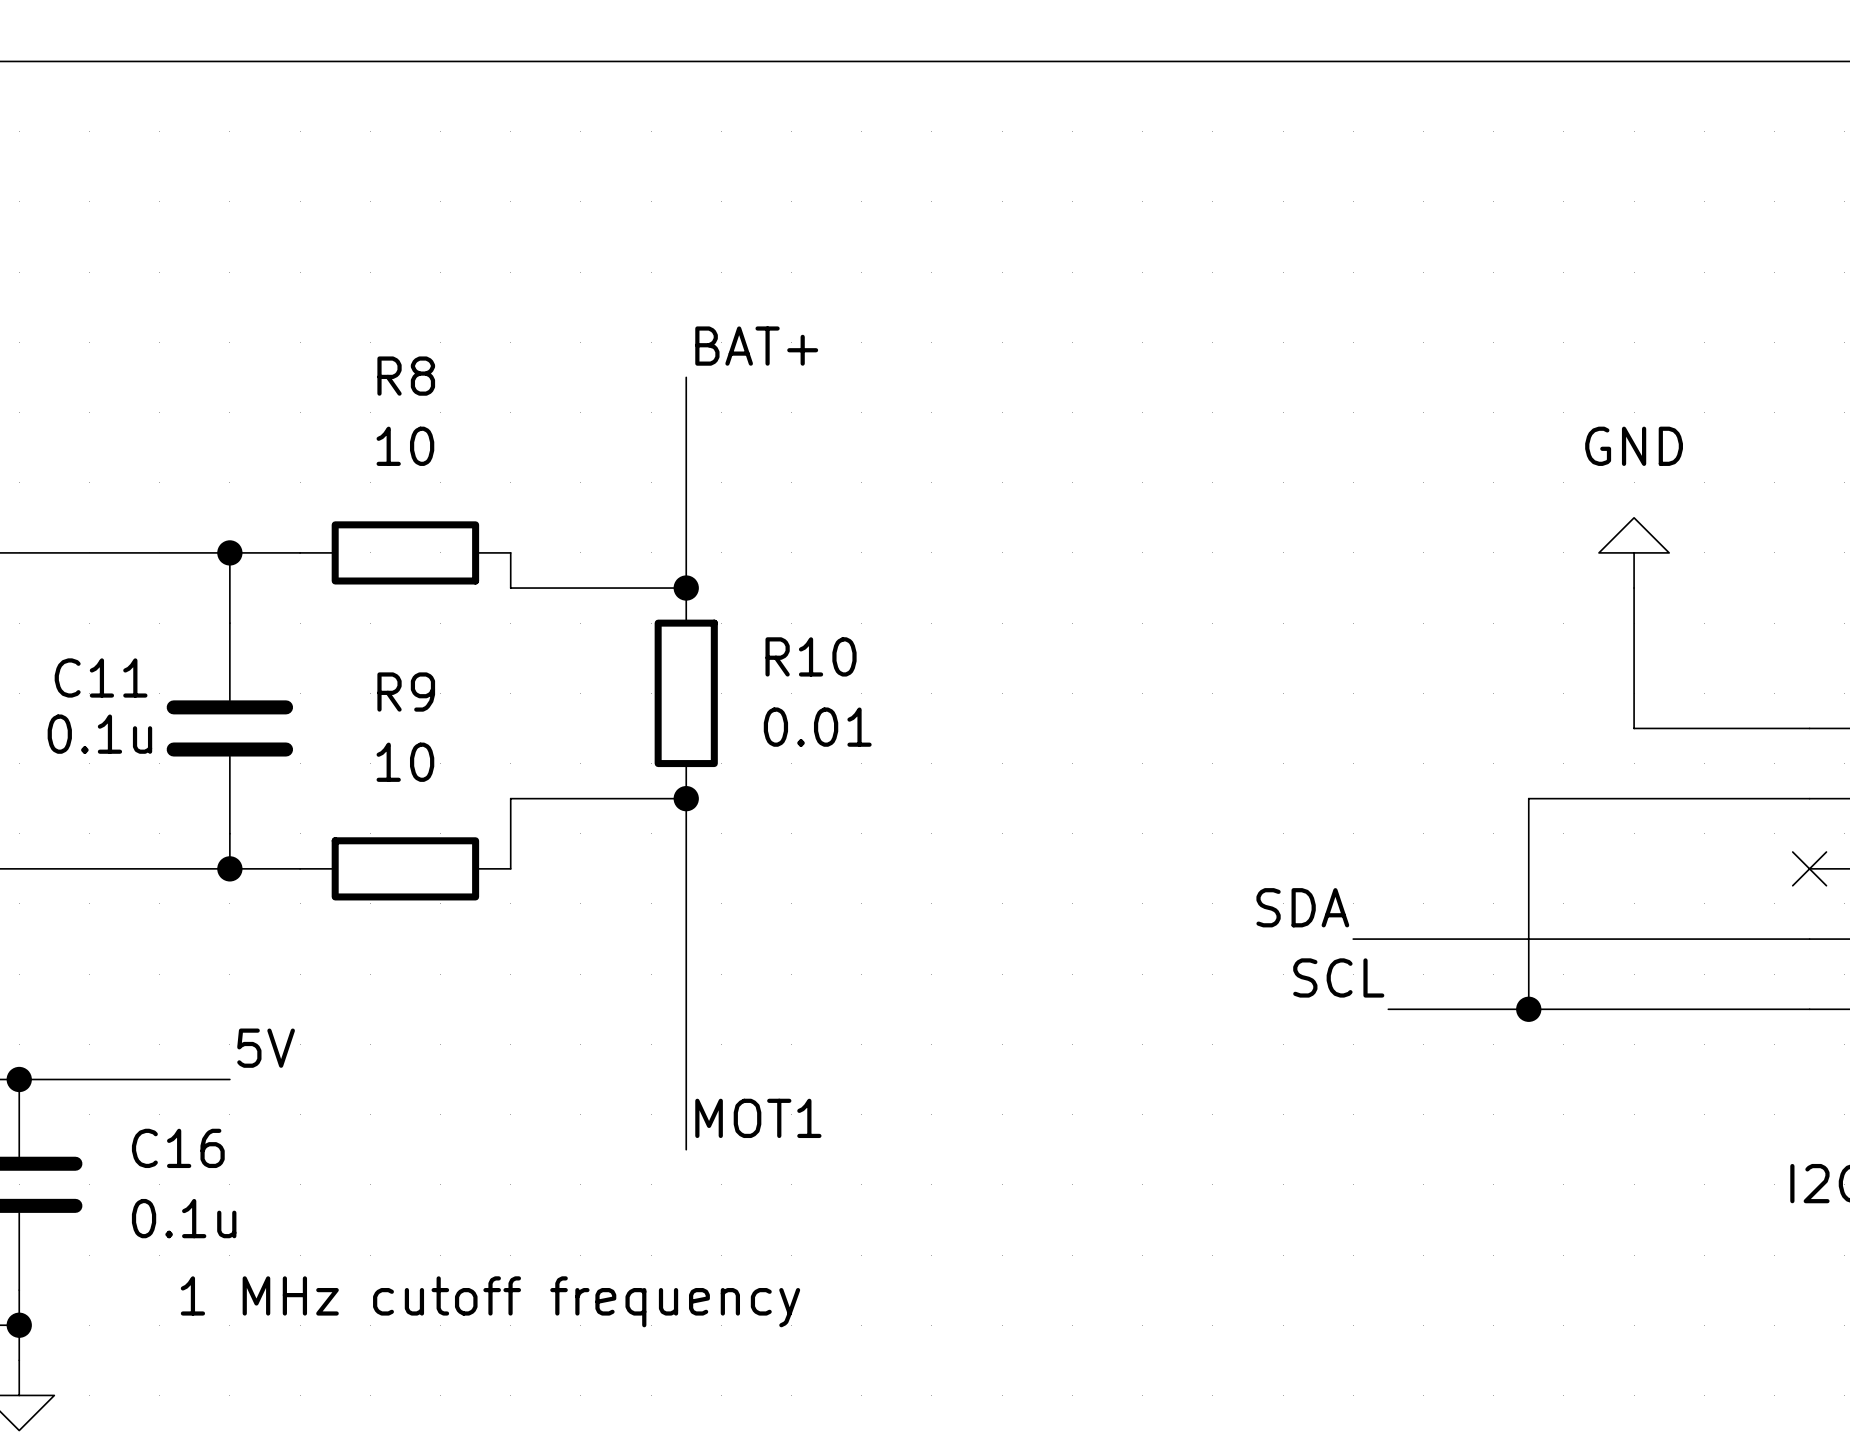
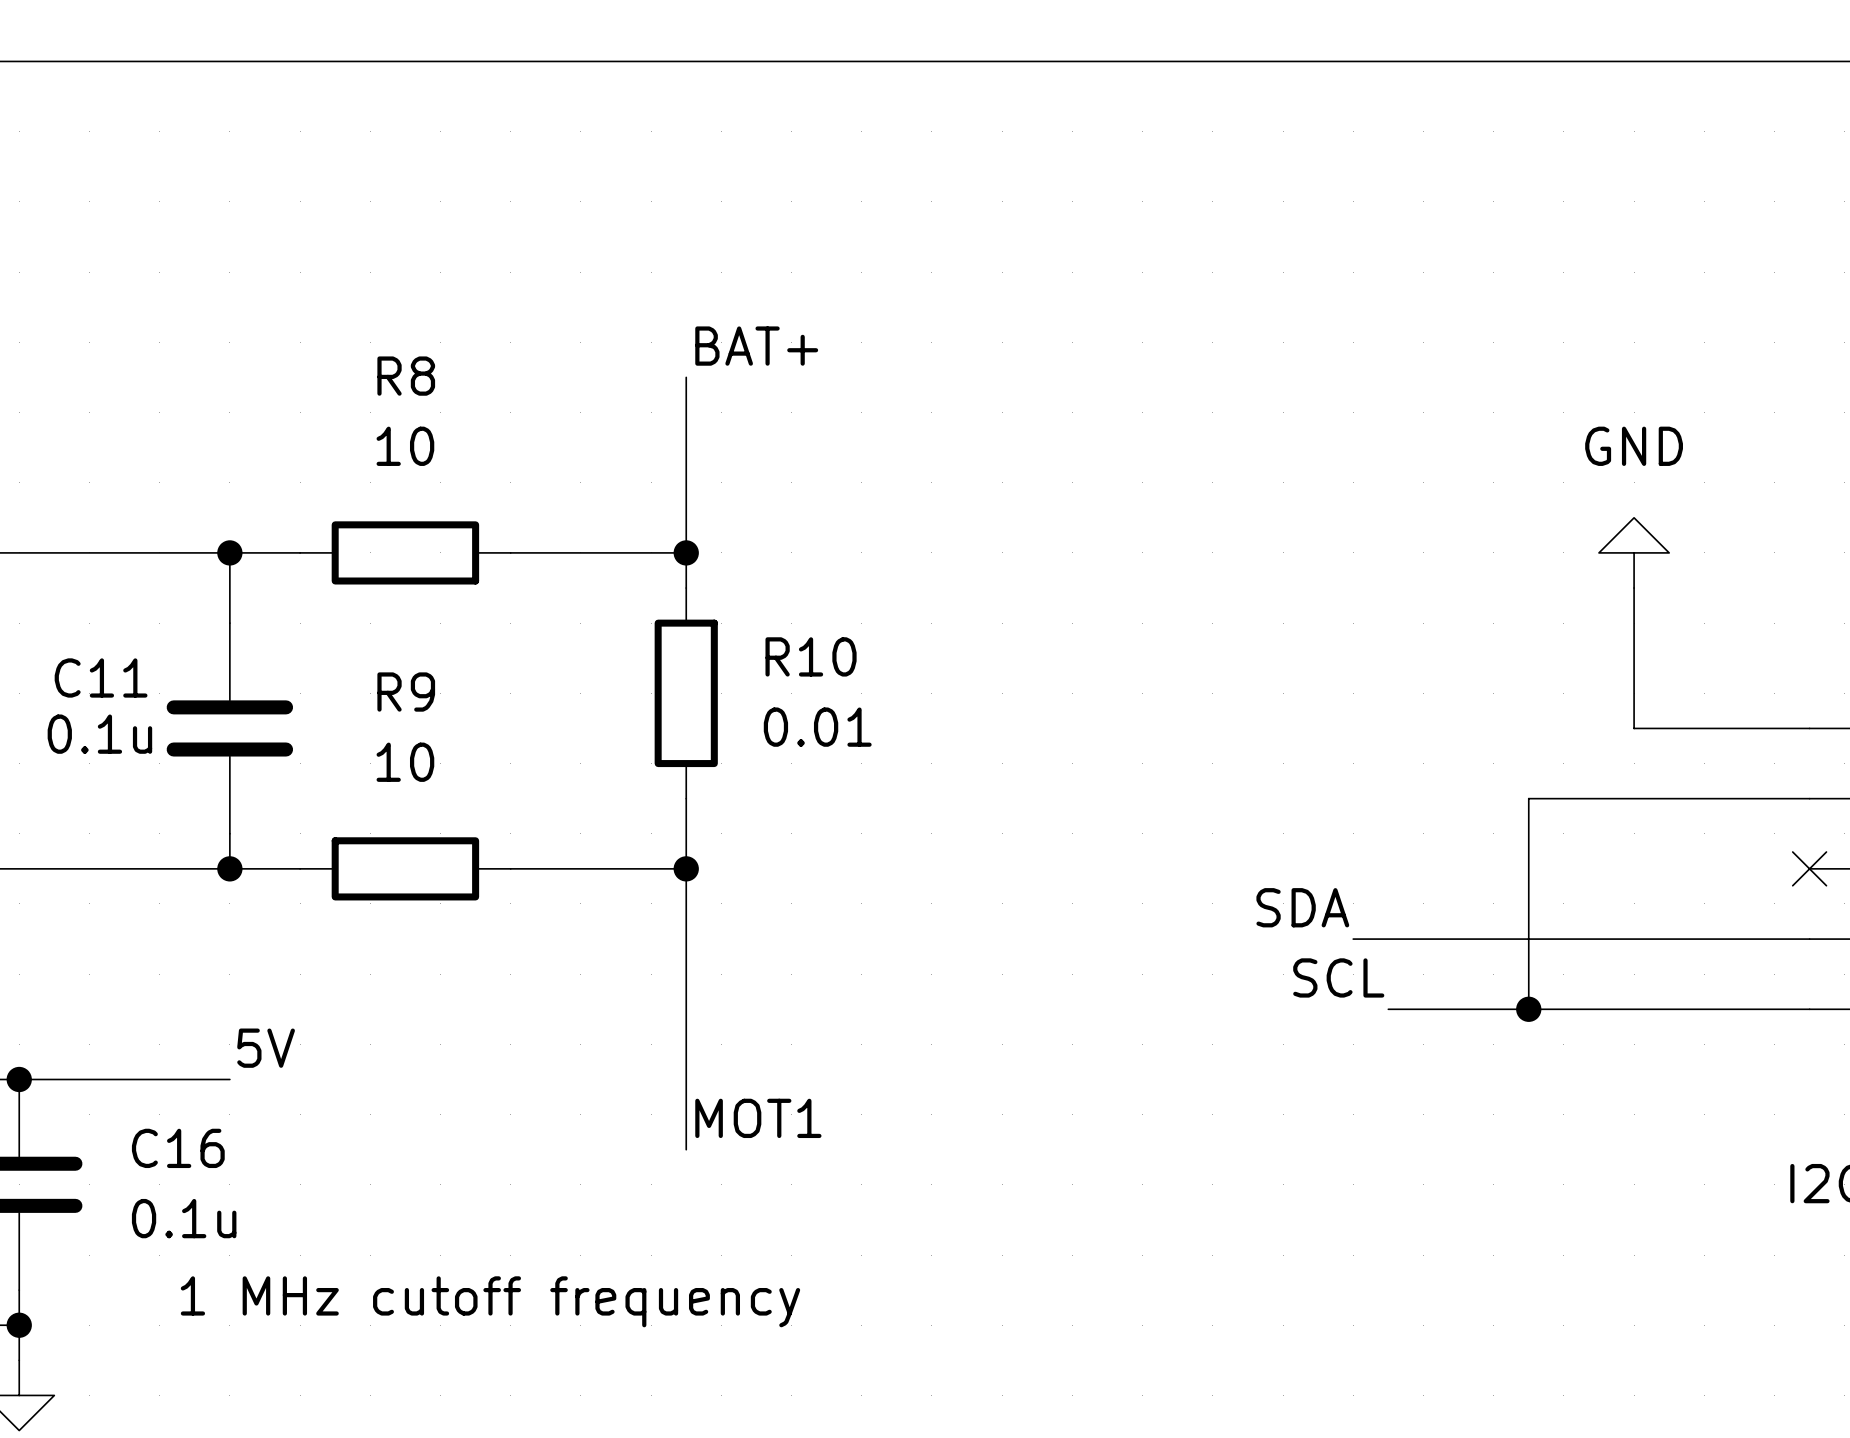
wire: (510, 552) (510, 588) (686, 588) -> (510, 552) (686, 552)
junction position: (686, 588) -> (686, 552)
wire: (686, 798) (510, 798) (510, 868) -> (686, 868) (510, 868)
junction position: (686, 798) -> (686, 868)

